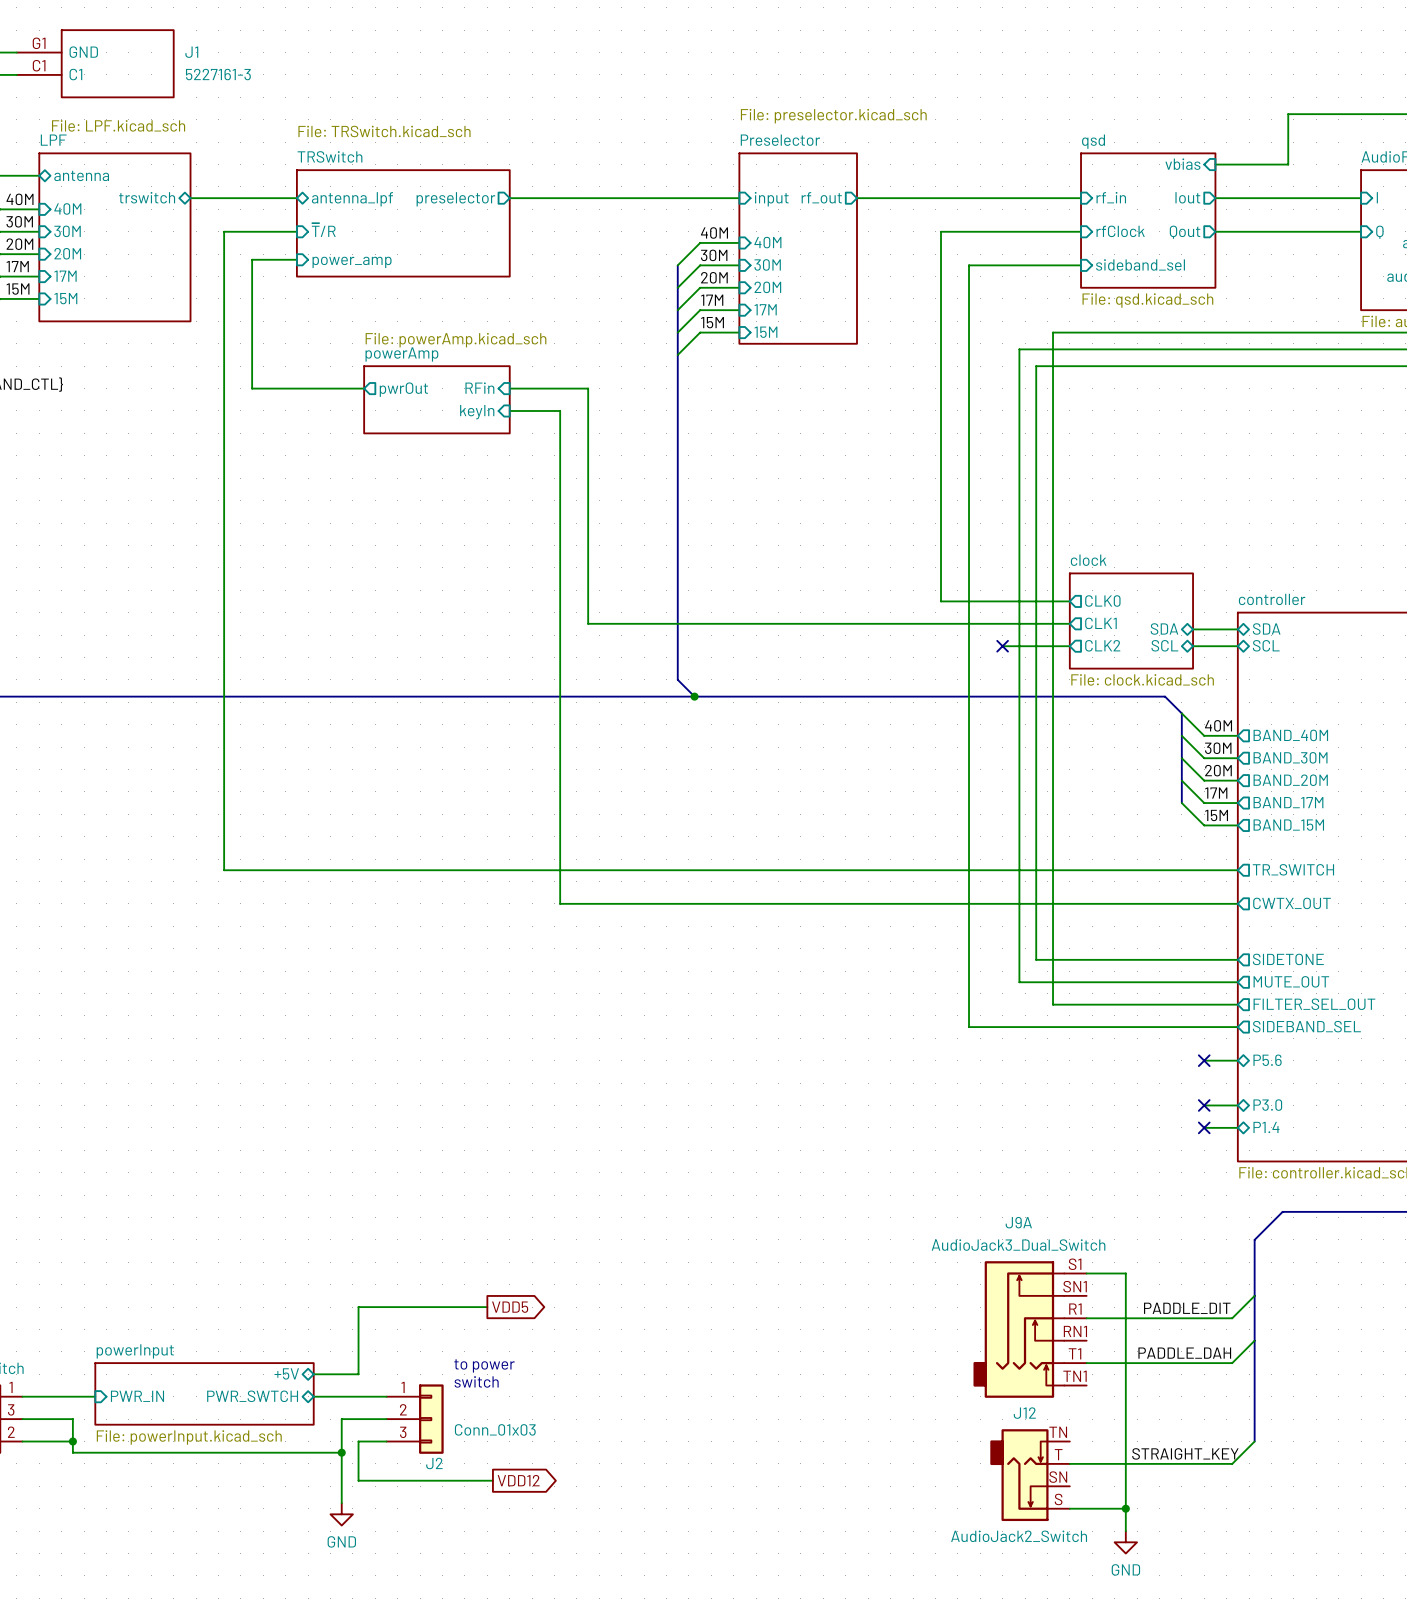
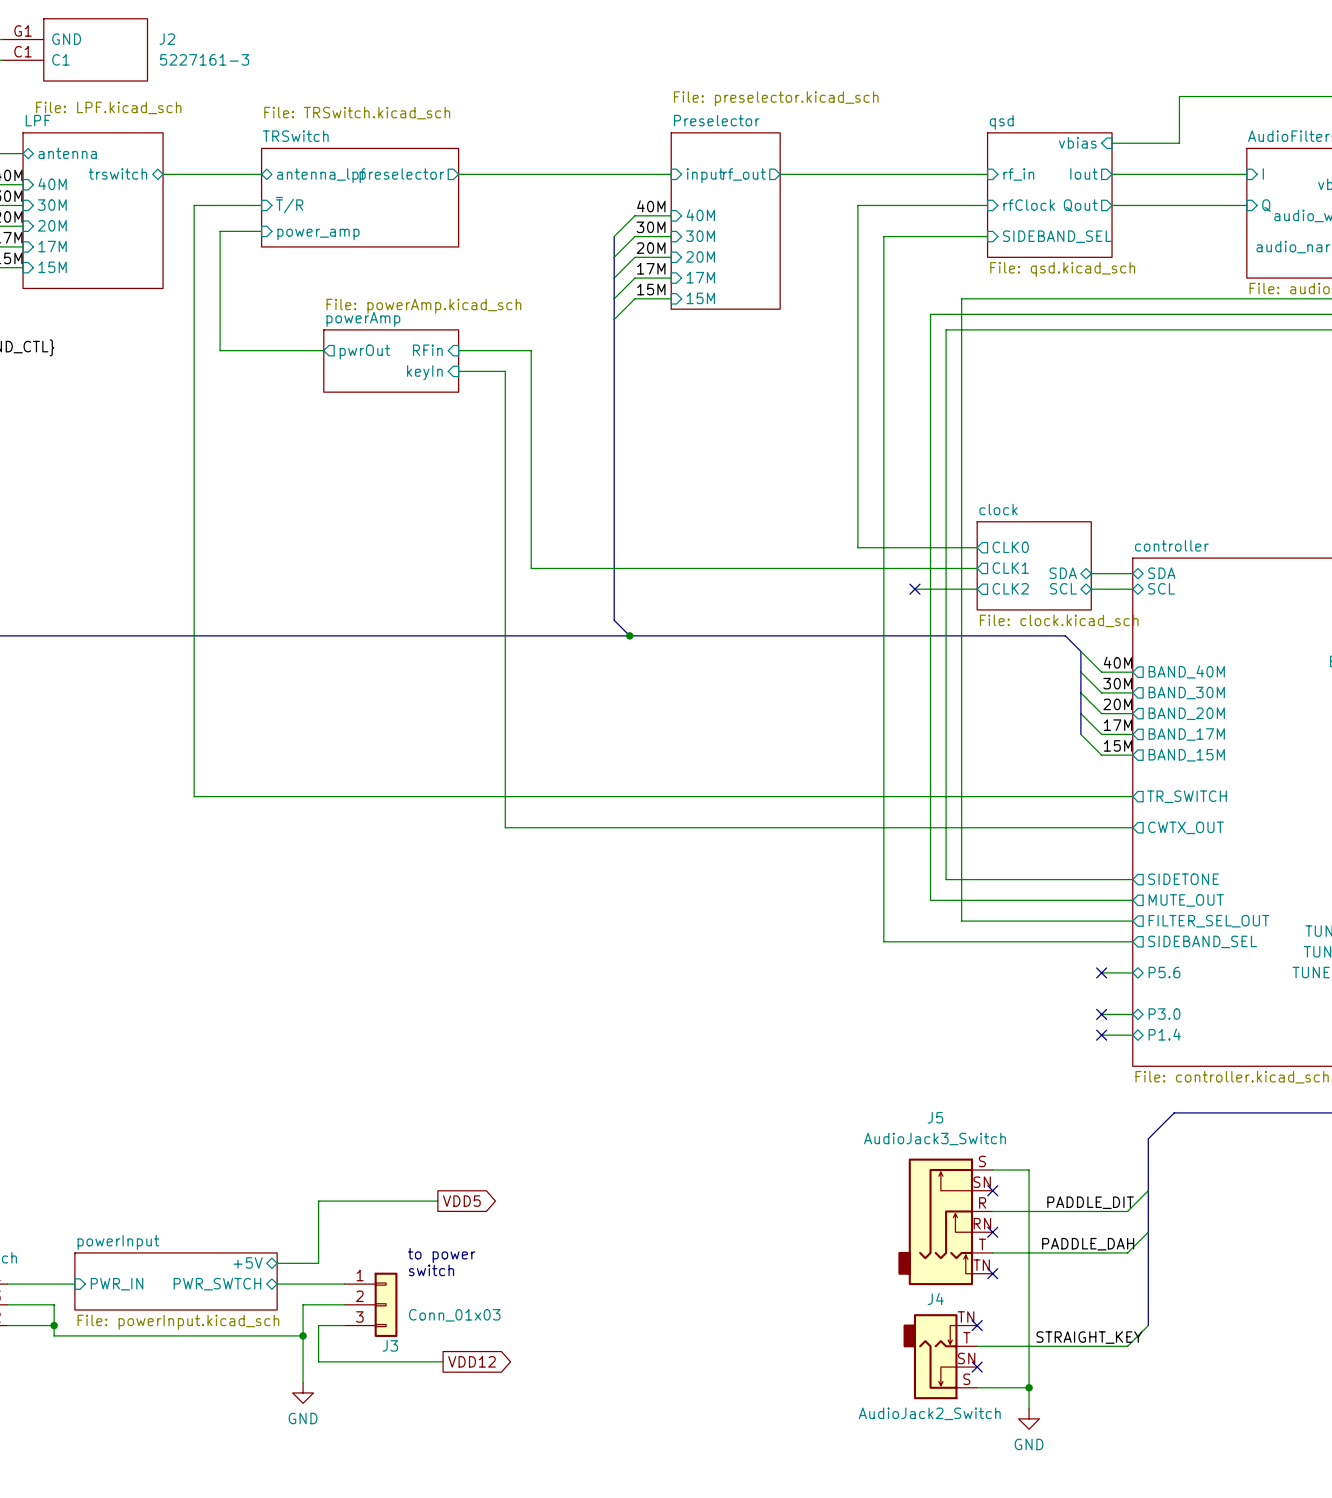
J1 name: J1 (191, 52) -> J2 (167, 39)
sheet pin: sideband_sel (1140, 264) -> SIDEBAND_SEL (1057, 236)
no-connect mark: none -> (992, 1190)
J9A: AudioJack3_Dual_Switch (1030, 1329) -> none
J5: none -> AudioJack3_Switch (945, 1221)
no-connect mark: none -> (992, 1232)
no-connect mark: none -> (992, 1273)
J12 name: J12 (1024, 1413) -> J4 (935, 1298)
no-connect mark: none -> (977, 1325)
J2 name: J2 (434, 1463) -> J3 (390, 1345)
no-connect mark: none -> (977, 1367)

